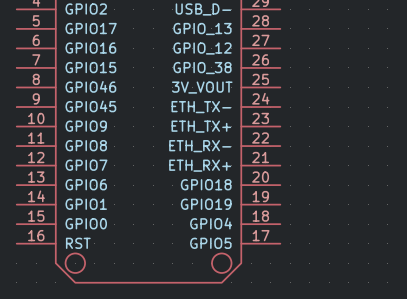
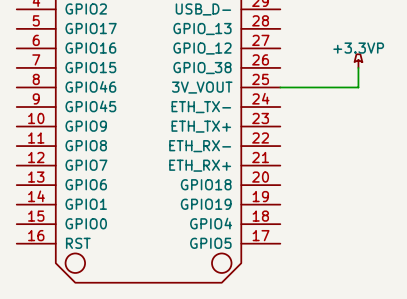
power symbol: none -> +3.3VP (358, 61)
wire: none -> (358, 67) (358, 87) (280, 87)

